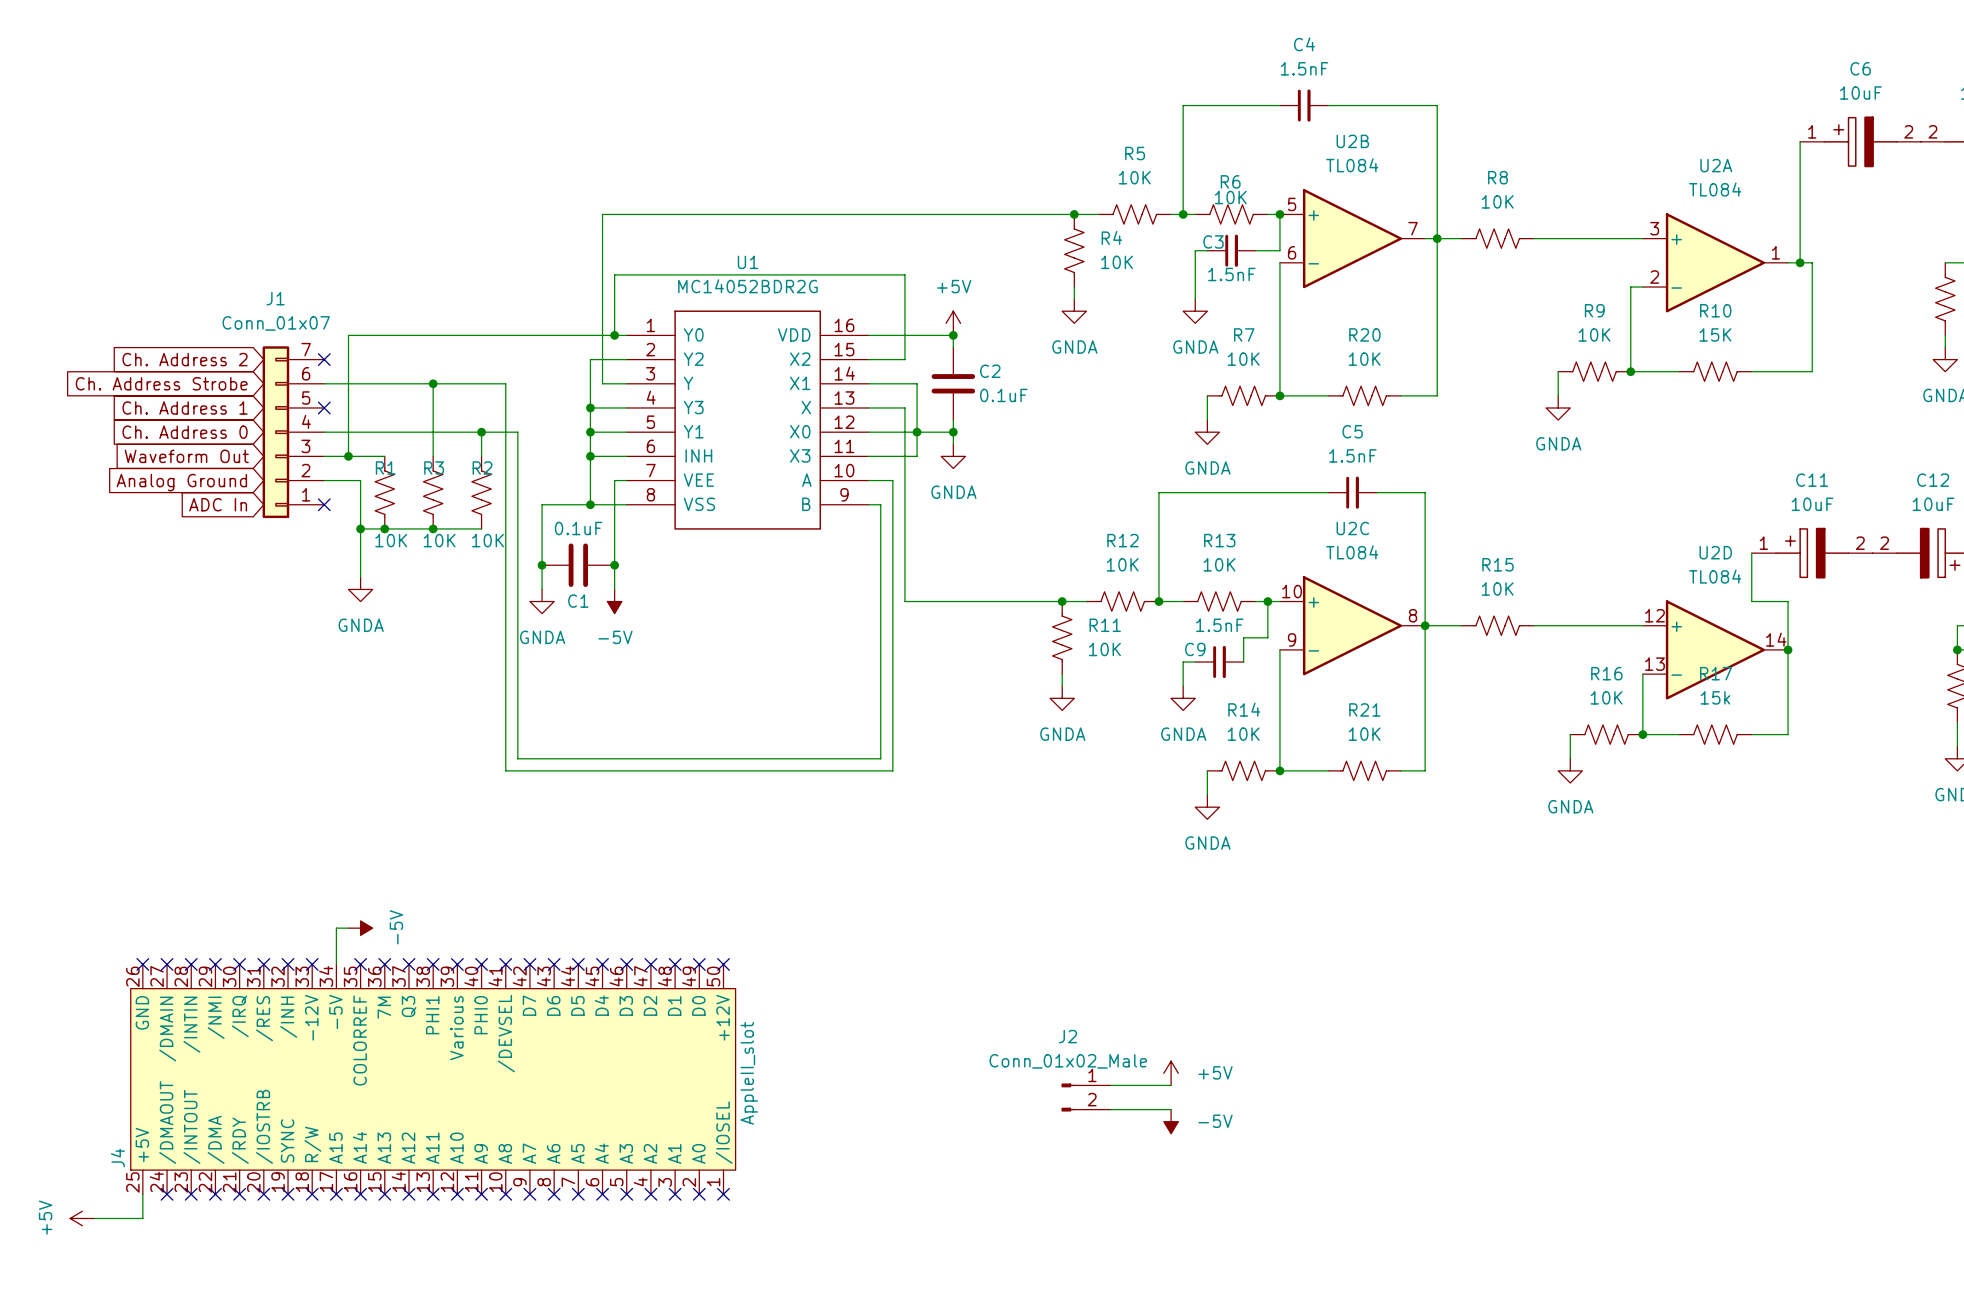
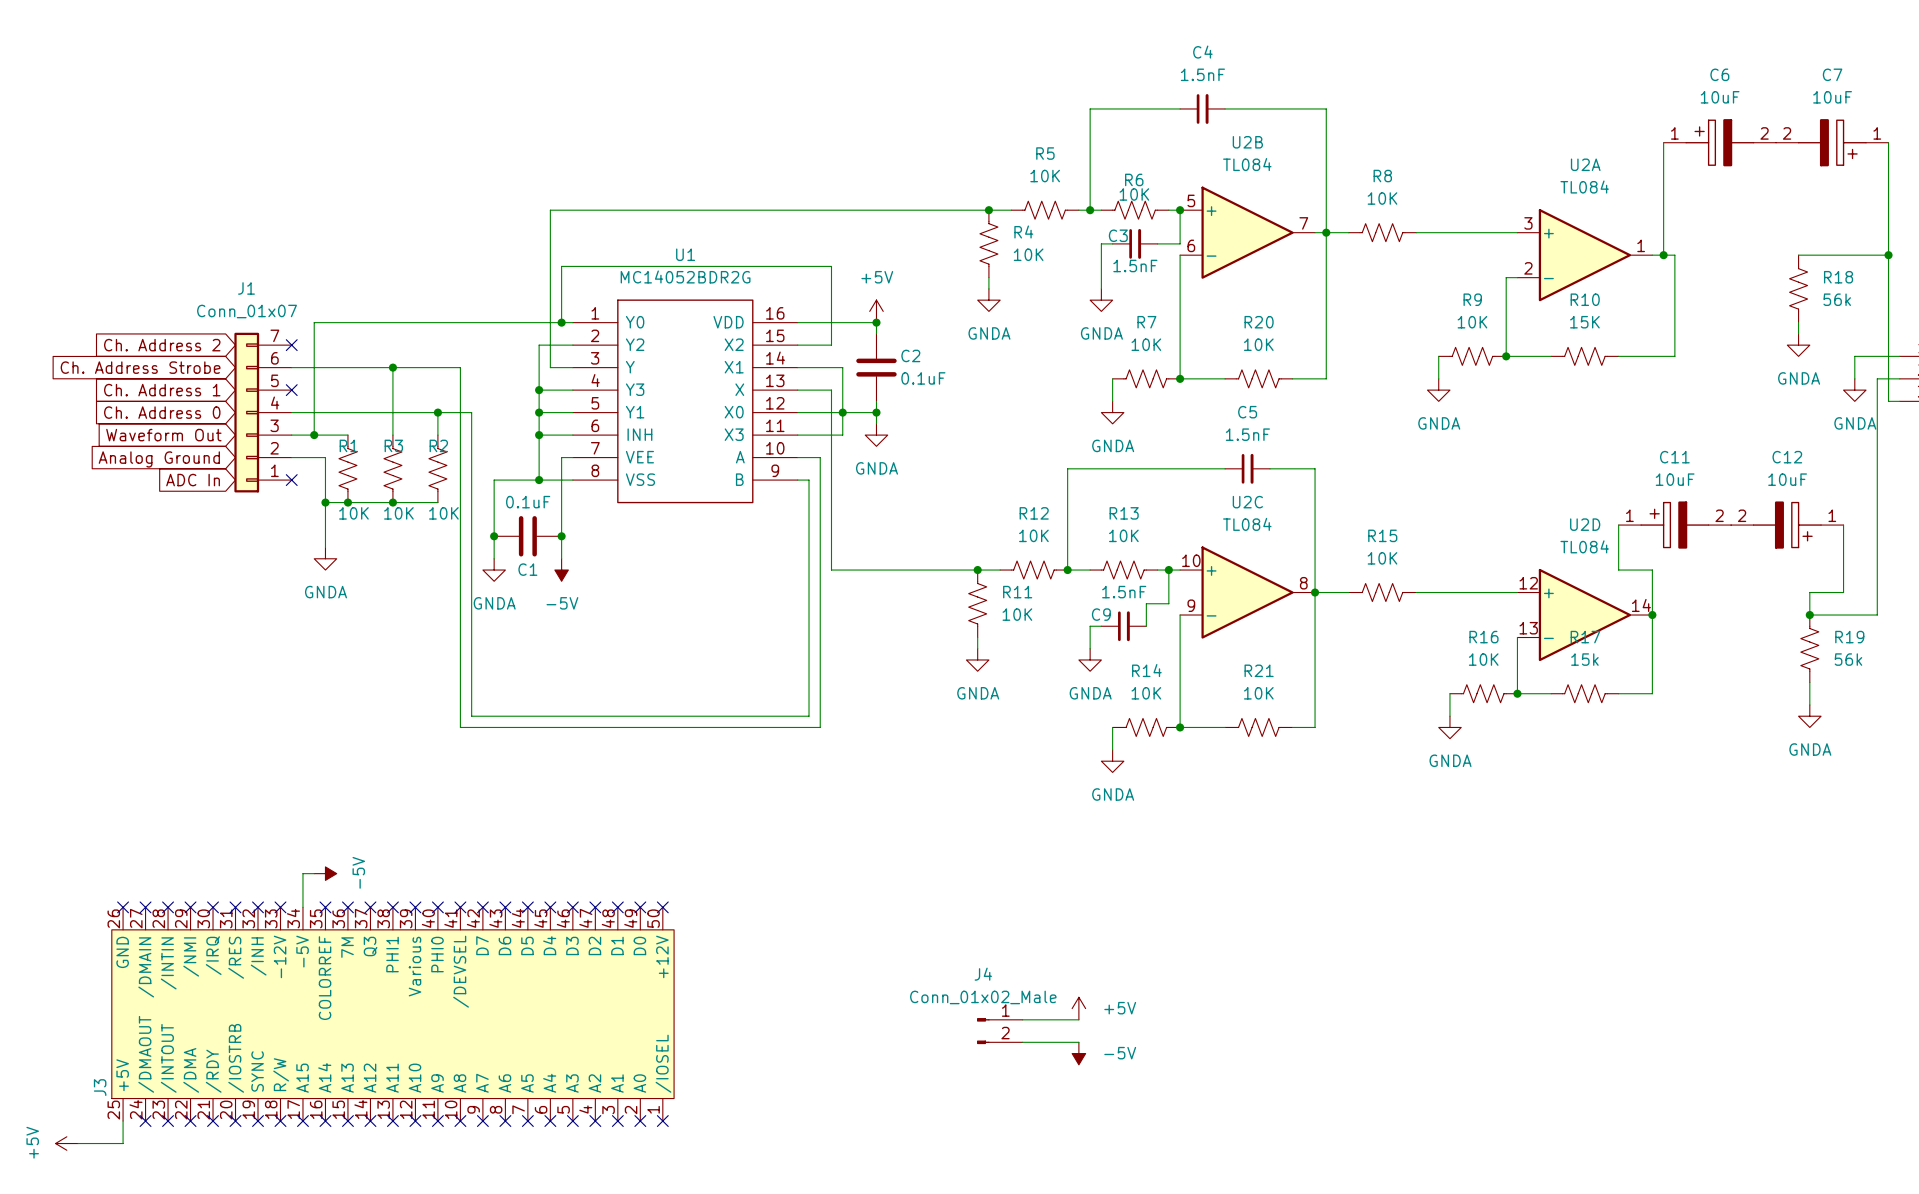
J2 name: J2 (1067, 1036) -> J4 (983, 974)
J4 value: AppleII_slot (749, 1073) -> none
J4 name: J4 (117, 1158) -> J3 (100, 1087)

